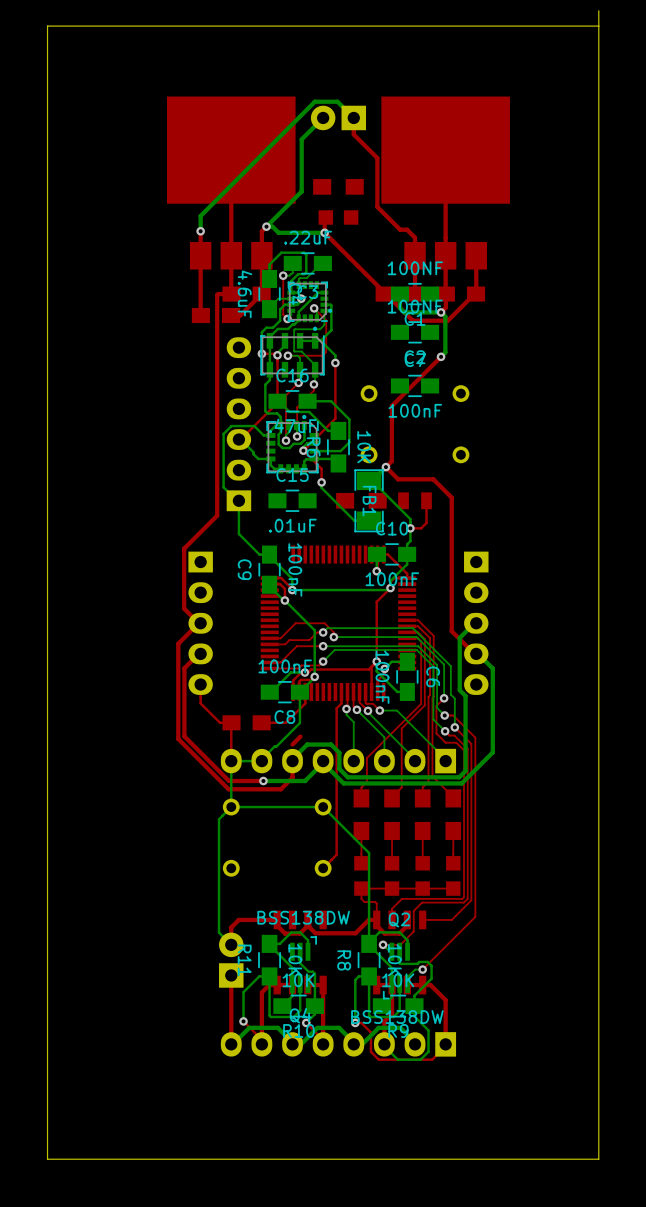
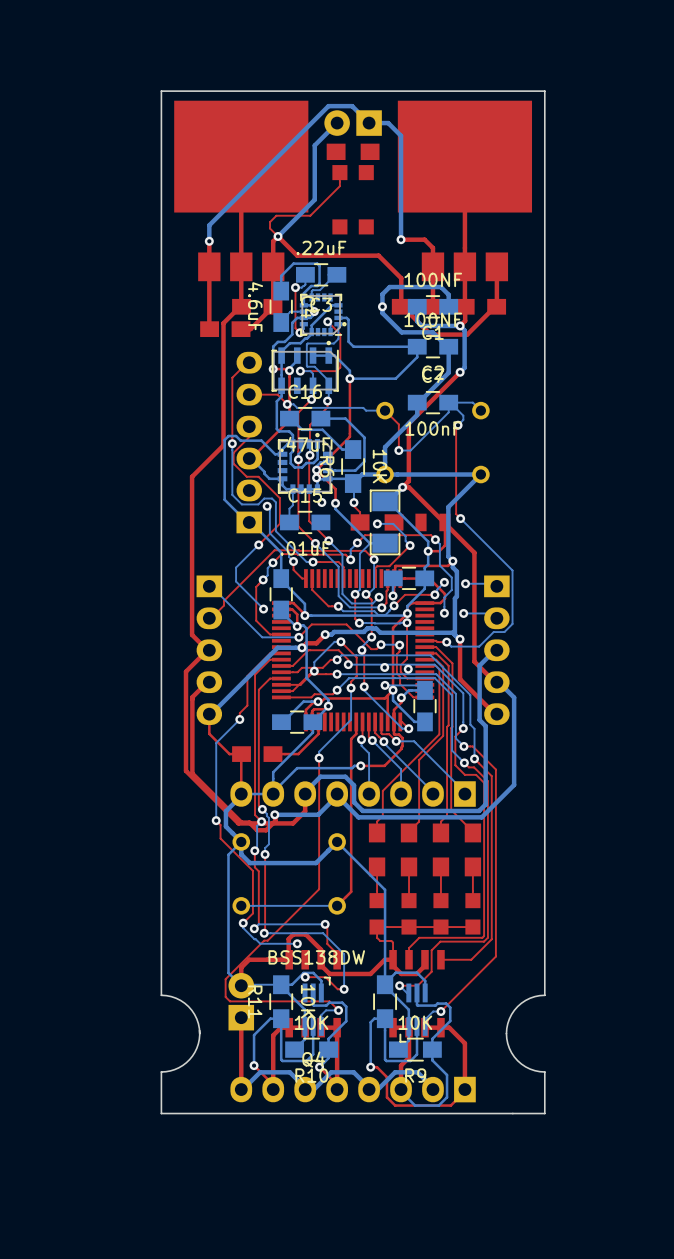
board edge: (598, 10) (598, 1159) (47, 1159) (47, 26) (598, 26) -> none
top track: (353, 117) (353, 134) (377, 158) (377, 206) (400, 229) -> (401, 239) (417, 239)
bottom track: none -> (369, 123) (388, 123) (401, 135) (401, 239)
part: none -> (353, 172)
part position: (338, 186) -> (353, 151)
top track: (325, 217) (324, 232) (384, 292) -> (339, 172) (339, 186) (310, 215) (276, 215) (270, 222) (270, 228) (297, 255) (378, 255) (401, 278) (401, 305)
bottom track: (266, 226) (272, 226) (278, 232) (324, 232) -> none
via: none -> (401, 239)
via: (324, 232) -> none
top track: (230, 294) (217, 295) (217, 515) (184, 548) -> (239, 306) (223, 323) (223, 445) (192, 476) (192, 572)
via: none -> (382, 306)
bottom track: none -> (448, 306) (448, 294) (440, 287) (389, 287) (382, 294) (382, 313) (401, 332) (432, 332) (448, 346) (448, 372) (417, 402) (417, 414) (385, 447) (385, 474)
bottom track: (330, 304) (331, 330) (320, 340) -> (345, 317) (348, 319) (348, 341) (353, 346) (417, 346) (417, 357) (395, 378) (349, 378)
top track: none -> (249, 362) (232, 377) (232, 443)
top track: none -> (249, 394) (277, 394) (287, 404)
bottom track: none -> (450, 402) (463, 415) (463, 419) (458, 425)
bottom track: none -> (287, 404) (293, 404) (297, 407) (363, 407) (366, 410) (385, 410)
via: none -> (287, 404)
top track: none -> (385, 410) (398, 424) (398, 450)
bottom track: none -> (480, 410) (472, 402) (448, 402) (448, 412) (410, 450) (398, 450)
top track: none -> (458, 425) (456, 427) (456, 514) (460, 518)
via: none -> (458, 425)
top track: none -> (249, 426) (249, 437) (233, 452) (233, 464) (246, 476) (258, 476) (279, 498) (279, 523) (258, 544)
bottom track: none -> (232, 443) (232, 494) (241, 504) (258, 504) (264, 498) (272, 498) (275, 502) (275, 531) (306, 562) (313, 562)
via: none -> (232, 443)
bottom track: (254, 426) (231, 426) (223, 433) (223, 487) -> (265, 444) (261, 440) (240, 440) (236, 436) (228, 436) (224, 440) (224, 499) (233, 508)
via: none -> (398, 450)
top track: none -> (309, 458) (309, 521) (328, 540)
top track: none -> (298, 459) (298, 526) (315, 543)
via: none -> (316, 477)
top track: (385, 467) (398, 479) (433, 479) (451, 497) (451, 631) (454, 634) -> (402, 487) (408, 487) (474, 552) (474, 661)
bottom track: none -> (292, 489) (292, 505) (289, 508) (289, 522)
via: none -> (321, 502)
top track: none -> (354, 502) (354, 506) (360, 512) (360, 522)
bottom track: none -> (354, 502) (353, 483) (362, 474) (480, 474) (448, 507) (448, 556) (452, 561) (452, 567) (456, 571) (454, 634)
via: none -> (354, 502)
bottom track: none -> (266, 506) (269, 509) (269, 533) (289, 552) (289, 557) (293, 561)
via: none -> (267, 506)
bottom track: none -> (460, 518) (512, 570) (512, 623) (504, 632) (493, 632) (479, 646) (451, 646) (446, 642)
via: none -> (460, 518)
bottom track: (238, 500) (238, 533) (259, 554) (269, 554) -> (249, 522) (281, 552) (281, 578)
FB1 name: FB1 (369, 501) -> none
bottom track: none -> (377, 523) (393, 523) (405, 536) (405, 541) (410, 545)
via: none -> (377, 523)
top track: none -> (435, 539) (430, 535) (365, 535) (357, 542)
bottom track: none -> (435, 539) (439, 544) (439, 565) (451, 577) (451, 590) (444, 597) (444, 613)
via: none -> (435, 539)
bottom track: none -> (328, 540) (342, 554) (342, 594) (351, 603) (372, 603) (379, 597)
via: none -> (328, 540)
bottom track: none -> (315, 543) (338, 566) (338, 596) (349, 607) (381, 607)
via: none -> (315, 543)
bottom track: none -> (357, 542) (350, 549) (350, 559)
via: none -> (357, 542)
bottom track: none -> (385, 543) (370, 543) (359, 553) (359, 589) (355, 594)
bottom track: none -> (258, 544) (236, 567) (236, 581) (263, 609)
via: none -> (258, 544)
top track: none -> (410, 545) (389, 566) (377, 566) (375, 568) (375, 578)
via: none -> (410, 545)
C10 name: C10 (392, 528) -> none
top track: none -> (350, 559) (345, 554) (281, 554) (273, 562)
via: none -> (350, 559)
top track: none -> (374, 559) (365, 550) (274, 550) (224, 600) (224, 605) (209, 618)
bottom track: none -> (374, 559) (374, 588) (367, 594)
via: none -> (374, 559)
top track: none -> (452, 561) (448, 565) (395, 565) (393, 578)
via: none -> (452, 561)
top track: none -> (293, 561) (293, 569) (302, 578) (305, 578)
via: none -> (293, 561)
top track: none -> (313, 562) (338, 562) (343, 567) (343, 578)
via: none -> (313, 562)
bottom track: none -> (273, 562) (267, 568) (267, 575) (263, 579)
via: none -> (273, 562)
top track: none -> (312, 578) (312, 589) (328, 606) (338, 606)
top track: none -> (387, 578) (386, 603) (381, 607)
top track: (387, 554) (407, 573) (407, 578) -> (404, 578) (429, 578) (444, 594) (444, 598) (440, 603) (424, 603)
top track: none -> (263, 579) (256, 586) (256, 620) (270, 634) (281, 634)
via: none -> (263, 579)
bottom track: none -> (444, 582) (437, 589) (437, 594)
via: none -> (444, 582)
bottom track: none -> (465, 583) (494, 583) (496, 586)
via: none -> (465, 583)
bottom track: none -> (209, 586) (262, 637) (298, 637)
C9 name: C9 (244, 569) -> none
C9 value: 100nF (295, 569) -> none
top track: none -> (355, 594) (355, 618) (359, 623)
via: none -> (355, 594)
top track: none -> (366, 594) (371, 599) (371, 637)
via: none -> (366, 594)
top track: none -> (434, 594) (405, 594) (394, 605)
via: none -> (434, 594)
via: none -> (379, 597)
C10 value: 100nF (392, 579) -> none
bottom track: none -> (394, 605) (385, 615) (378, 615) (374, 611) (343, 611) (338, 606)
via: none -> (394, 605)
via: none -> (338, 606)
via: none -> (381, 607)
via: none -> (263, 609)
via: none -> (444, 613)
bottom track: none -> (463, 613) (492, 613) (496, 618)
via: none -> (463, 613)
top track: none -> (407, 622) (407, 658) (400, 665) (400, 672) (407, 678) (424, 678)
bottom track: none -> (407, 622) (359, 623)
via: none -> (407, 622)
via: none -> (359, 623)
bottom track: (282, 599) (314, 630) (314, 670) -> (295, 625) (303, 625) (306, 628) (306, 678) (328, 699)
top track: none -> (325, 634) (316, 643) (306, 643) (301, 647)
bottom track: none -> (325, 634) (331, 634) (334, 631) (363, 631) (367, 628) (372, 628) (376, 628) (380, 632) (452, 632) (460, 639)
via: none -> (325, 634)
top track: none -> (298, 637) (311, 624) (346, 624) (371, 649) (376, 649) (380, 644)
via: none -> (298, 637)
bottom track: none -> (371, 637) (362, 646) (362, 649)
via: none -> (371, 637)
top track: none -> (460, 639) (460, 679) (496, 714)
via: none -> (460, 639)
top track: none -> (424, 640) (446, 642)
top track: none -> (340, 641) (356, 657) (356, 676) (351, 681) (351, 688)
bottom track: none -> (340, 641) (334, 641) (314, 662) (314, 671)
via: none -> (340, 641)
via: none -> (446, 642)
bottom track: none -> (380, 644) (399, 645)
via: none -> (380, 644)
top track: none -> (399, 645) (399, 651) (396, 654) (396, 673) (400, 676) (400, 684) (413, 697) (424, 697)
via: none -> (399, 645)
bottom track: none -> (301, 647) (277, 647) (209, 714)
via: none -> (301, 647)
top track: none -> (361, 650) (364, 652) (364, 686)
via: none -> (361, 650)
top track: none -> (281, 653) (270, 653) (247, 676) (247, 705) (239, 713) (239, 719)
top track: none -> (281, 659) (270, 659) (255, 674) (255, 815) (261, 821)
via: none -> (384, 667)
via: none -> (408, 669)
top track: none -> (314, 671) (300, 684) (281, 684)
via: none -> (314, 671)
top track: none -> (281, 678) (270, 678) (258, 689) (258, 805) (262, 809)
bottom track: none -> (385, 685) (419, 685) (424, 690)
via: none -> (385, 685)
bottom track: none -> (364, 686) (364, 690) (402, 728) (408, 728)
via: none -> (364, 686)
bottom track: none -> (351, 688) (351, 719) (319, 751) (319, 758)
via: none -> (351, 688)
C8 value: 100nF (285, 666) -> none
C6 name: C6 (433, 676) -> none
C6 value: 100nF (382, 677) -> none
bottom track: none -> (239, 719) (216, 743) (216, 820)
via: none -> (239, 719)
top track: none -> (393, 721) (393, 733) (398, 734) (402, 738) (401, 748) (384, 765) (360, 765)
top track: none -> (400, 721) (408, 728)
via: none -> (408, 728)
bottom track: (299, 702) (299, 723) (274, 746) -> (312, 732) (273, 772) (273, 792)
C8 name: C8 (284, 717) -> none
top track: none -> (319, 758) (319, 889) (225, 979) (225, 997) (230, 1001) (329, 1001) (338, 1010)
via: none -> (319, 758)
bottom track: none -> (360, 765) (354, 765) (352, 768) (297, 768) (286, 778)
via: none -> (360, 765)
top track: (184, 736) (228, 781) (263, 781) -> (192, 768) (192, 773) (241, 822) (249, 822) (257, 830) (266, 830) (275, 820) (275, 814)
top track: (300, 736) (292, 744) -> none
bottom track: (231, 762) (231, 807) (323, 807) -> (241, 795) (225, 811) (225, 826) (241, 841) (241, 854) (249, 863) (315, 863) (337, 841)
bottom track: none -> (262, 809) (268, 818) (268, 844) (265, 848) (265, 854)
via: none -> (262, 809)
top track: none -> (216, 820) (220, 824) (220, 838) (252, 870) (252, 913) (243, 923)
via: none -> (216, 820)
bottom track: none -> (261, 821) (257, 826) (257, 848) (254, 850)
via: none -> (261, 821)
top track: none -> (254, 850) (254, 867) (258, 871) (258, 924) (254, 928)
via: none -> (254, 850)
top track: none -> (265, 854) (264, 933)
via: none -> (265, 854)
bottom track: none -> (337, 905) (241, 905)
bottom track: none -> (243, 923) (243, 928) (260, 943) (297, 943)
via: none -> (243, 923)
top track: none -> (325, 924) (327, 926) (327, 943) (337, 953) (337, 959)
bottom track: none -> (325, 924) (258, 924) (254, 928)
via: none -> (325, 924)
via: none -> (254, 928)
bottom track: none -> (264, 933) (323, 933) (344, 954) (344, 989)
via: none -> (264, 933)
via: none -> (297, 943)
top track: (277, 919) (277, 925) (285, 933) (299, 933) (307, 925) (315, 933) (355, 933) -> (321, 965) (329, 973) (370, 973)
top track: none -> (321, 959) (321, 949) (305, 934) (293, 934) (288, 939) (289, 959)
Q2 name: Q2 (399, 919) -> none
top track: none -> (305, 977) (325, 977) (337, 989) (344, 989)
via: none -> (305, 977)
bottom track: none -> (281, 984) (241, 985)
via: none -> (344, 989)
R8 name: R8 (344, 960) -> none
R8 value: 10K (394, 960) -> none
bottom track: (300, 963) (308, 971) (314, 973) (314, 995) -> (313, 1005) (342, 1002) (346, 1006) (346, 1021) (328, 1038)
bottom track: none -> (338, 1010) (326, 1010) (321, 1015) (321, 1026)
via: none -> (338, 1010)
board edge: none -> (199, 1030) (199, 1034) (199, 1039) (196, 1048) (189, 1059) (174, 1069) (161, 1071) (161, 1113) (544, 1113) (544, 1071) (530, 1069) (517, 1060) (509, 1048) (506, 1033) (509, 1018) (517, 1006) (530, 998) (544, 995) (544, 91) (161, 91) (161, 995) (176, 998) (188, 1006) (196, 1018) (198, 1023) (199, 1028) (199, 1033)
Q2 value: BSS138DW (397, 1017) -> none

